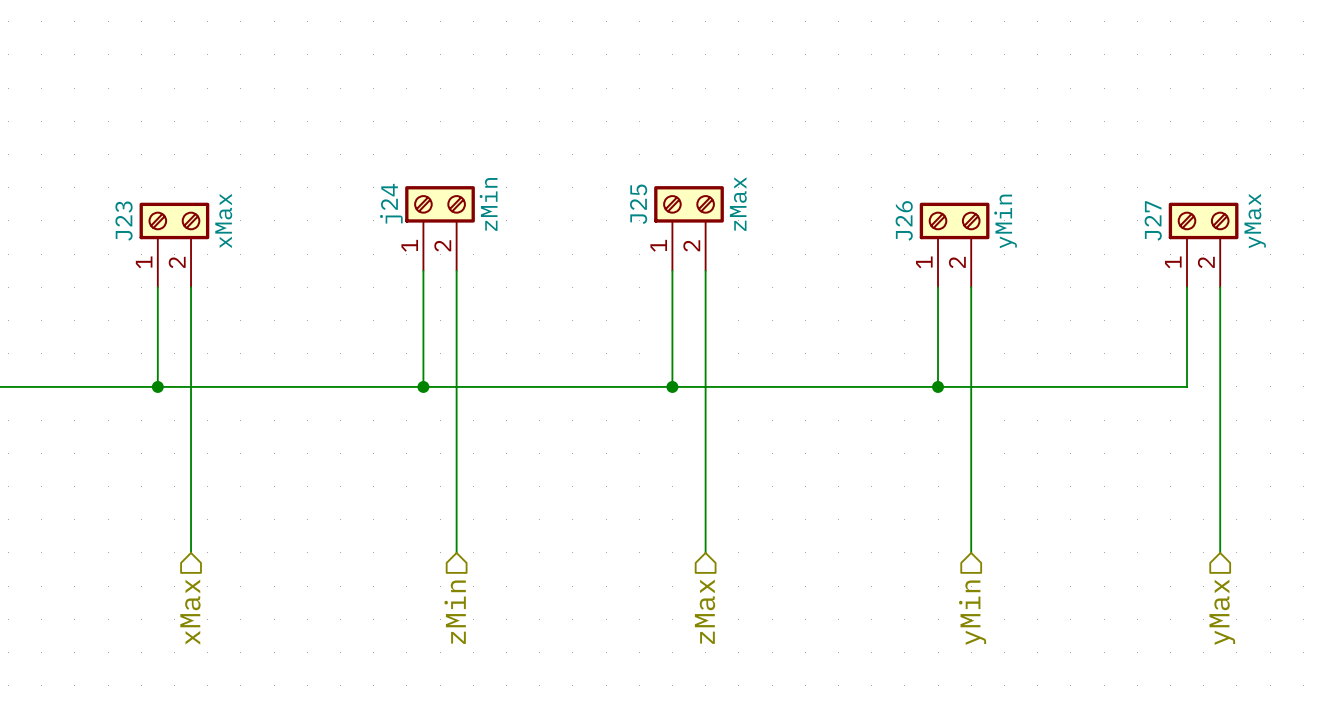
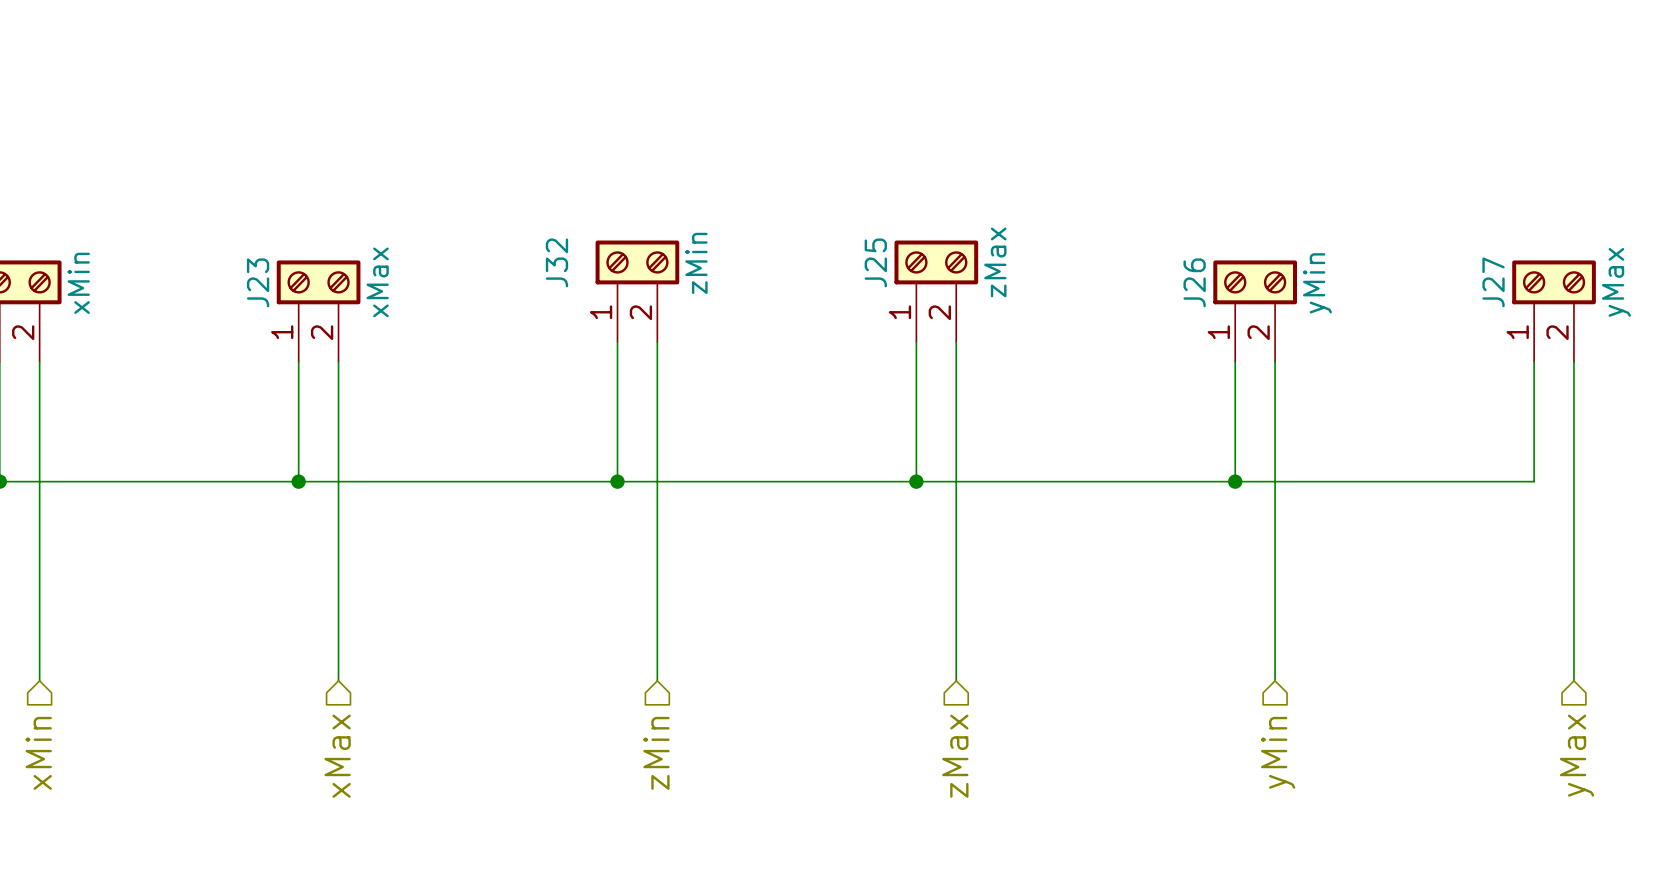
j24 name: j24 (391, 203) -> J32 (556, 262)

